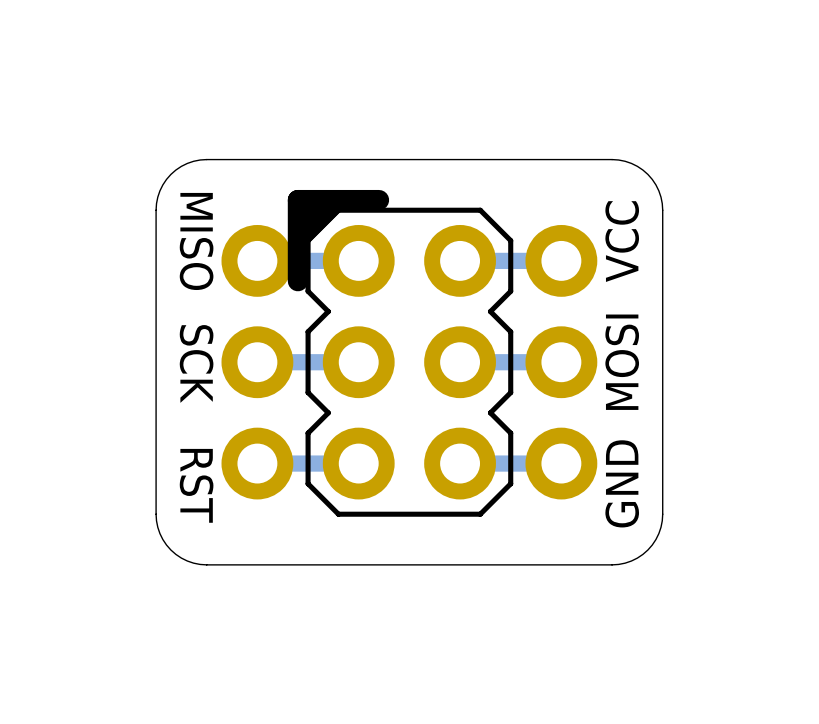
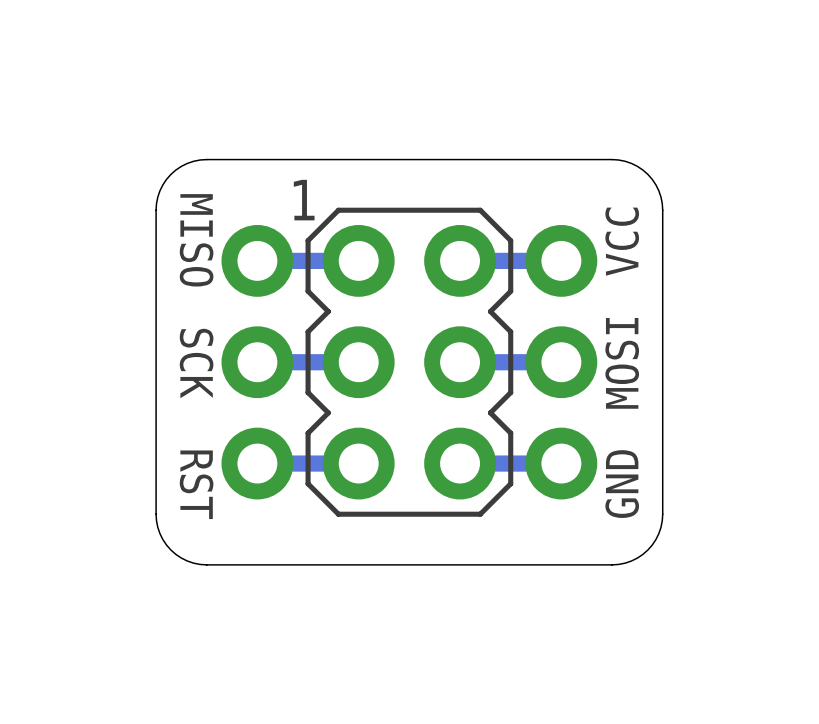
line: (379, 200) (297, 200) (297, 281) -> none
part footprint: [305, 207, 514, 517] -> [305, 207, 514, 517]

